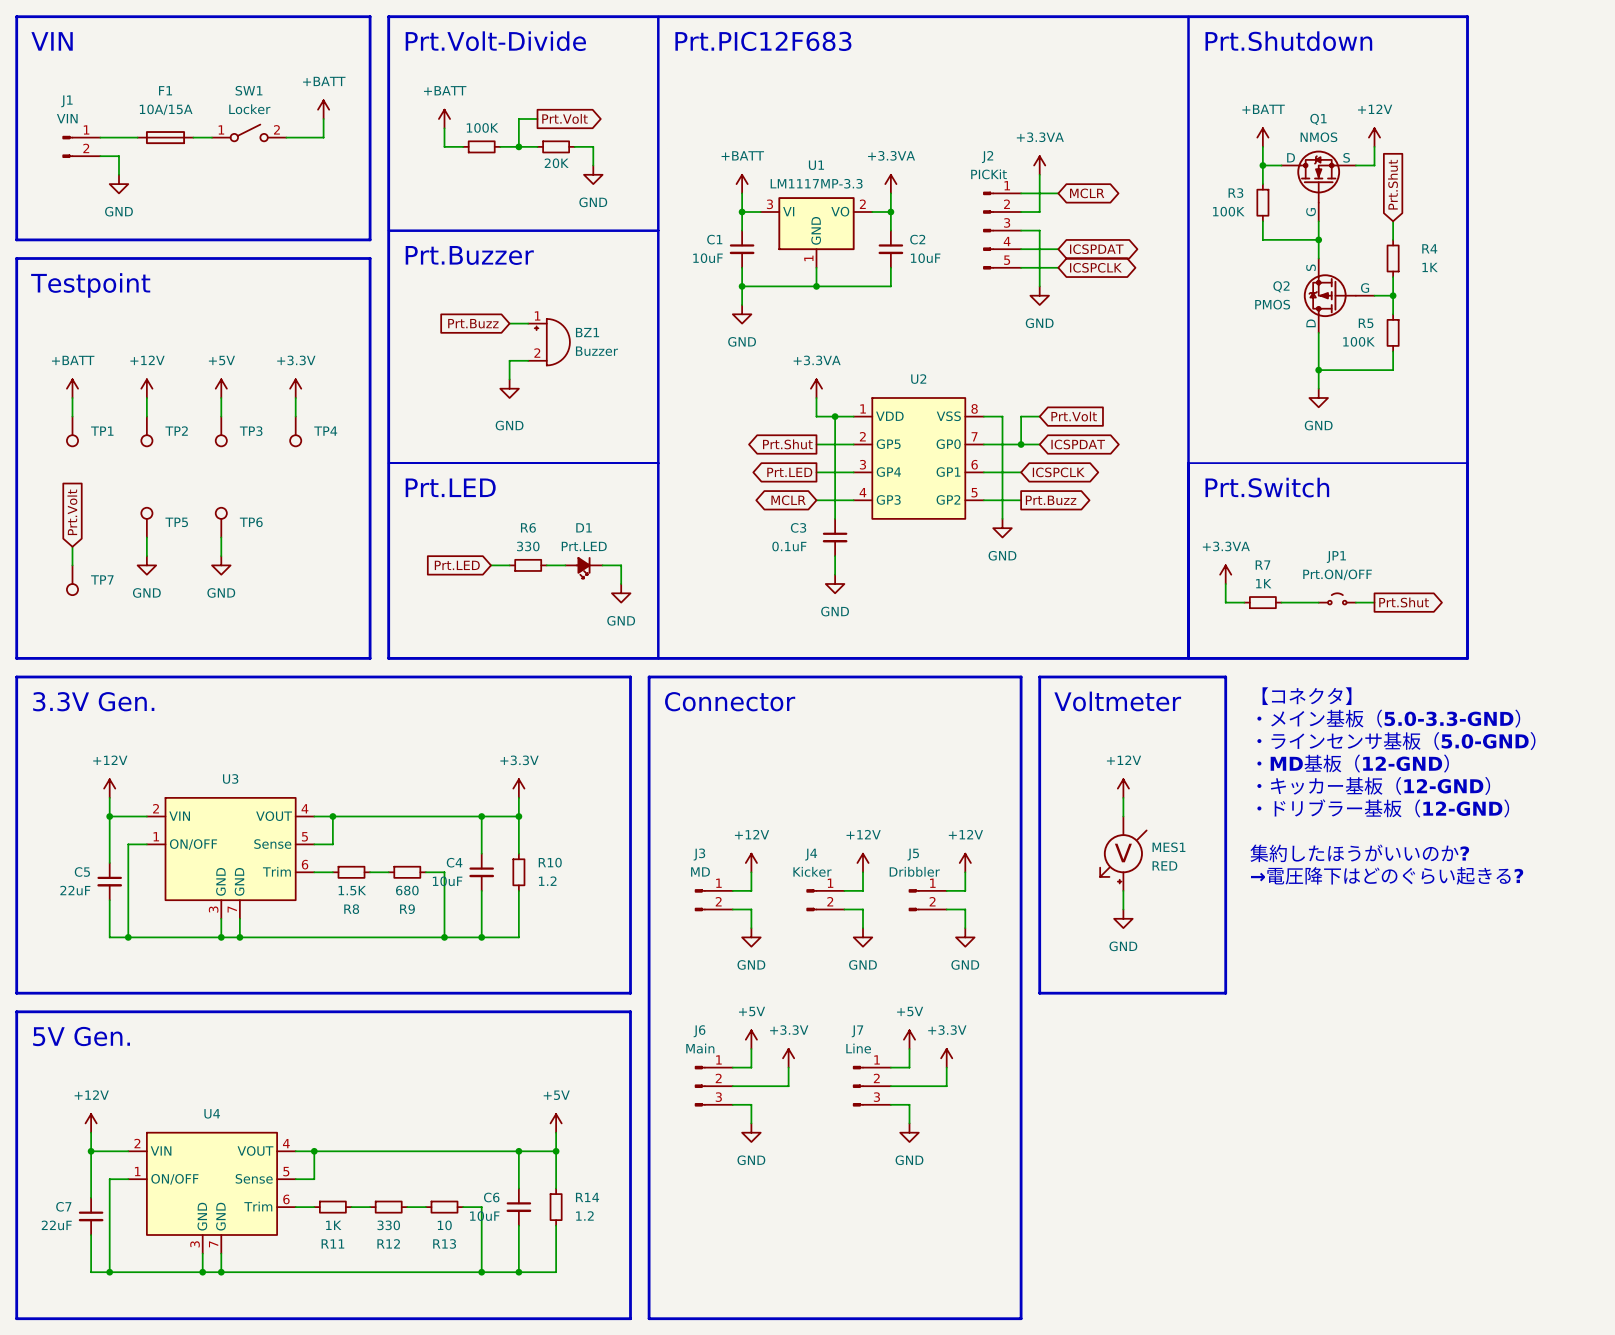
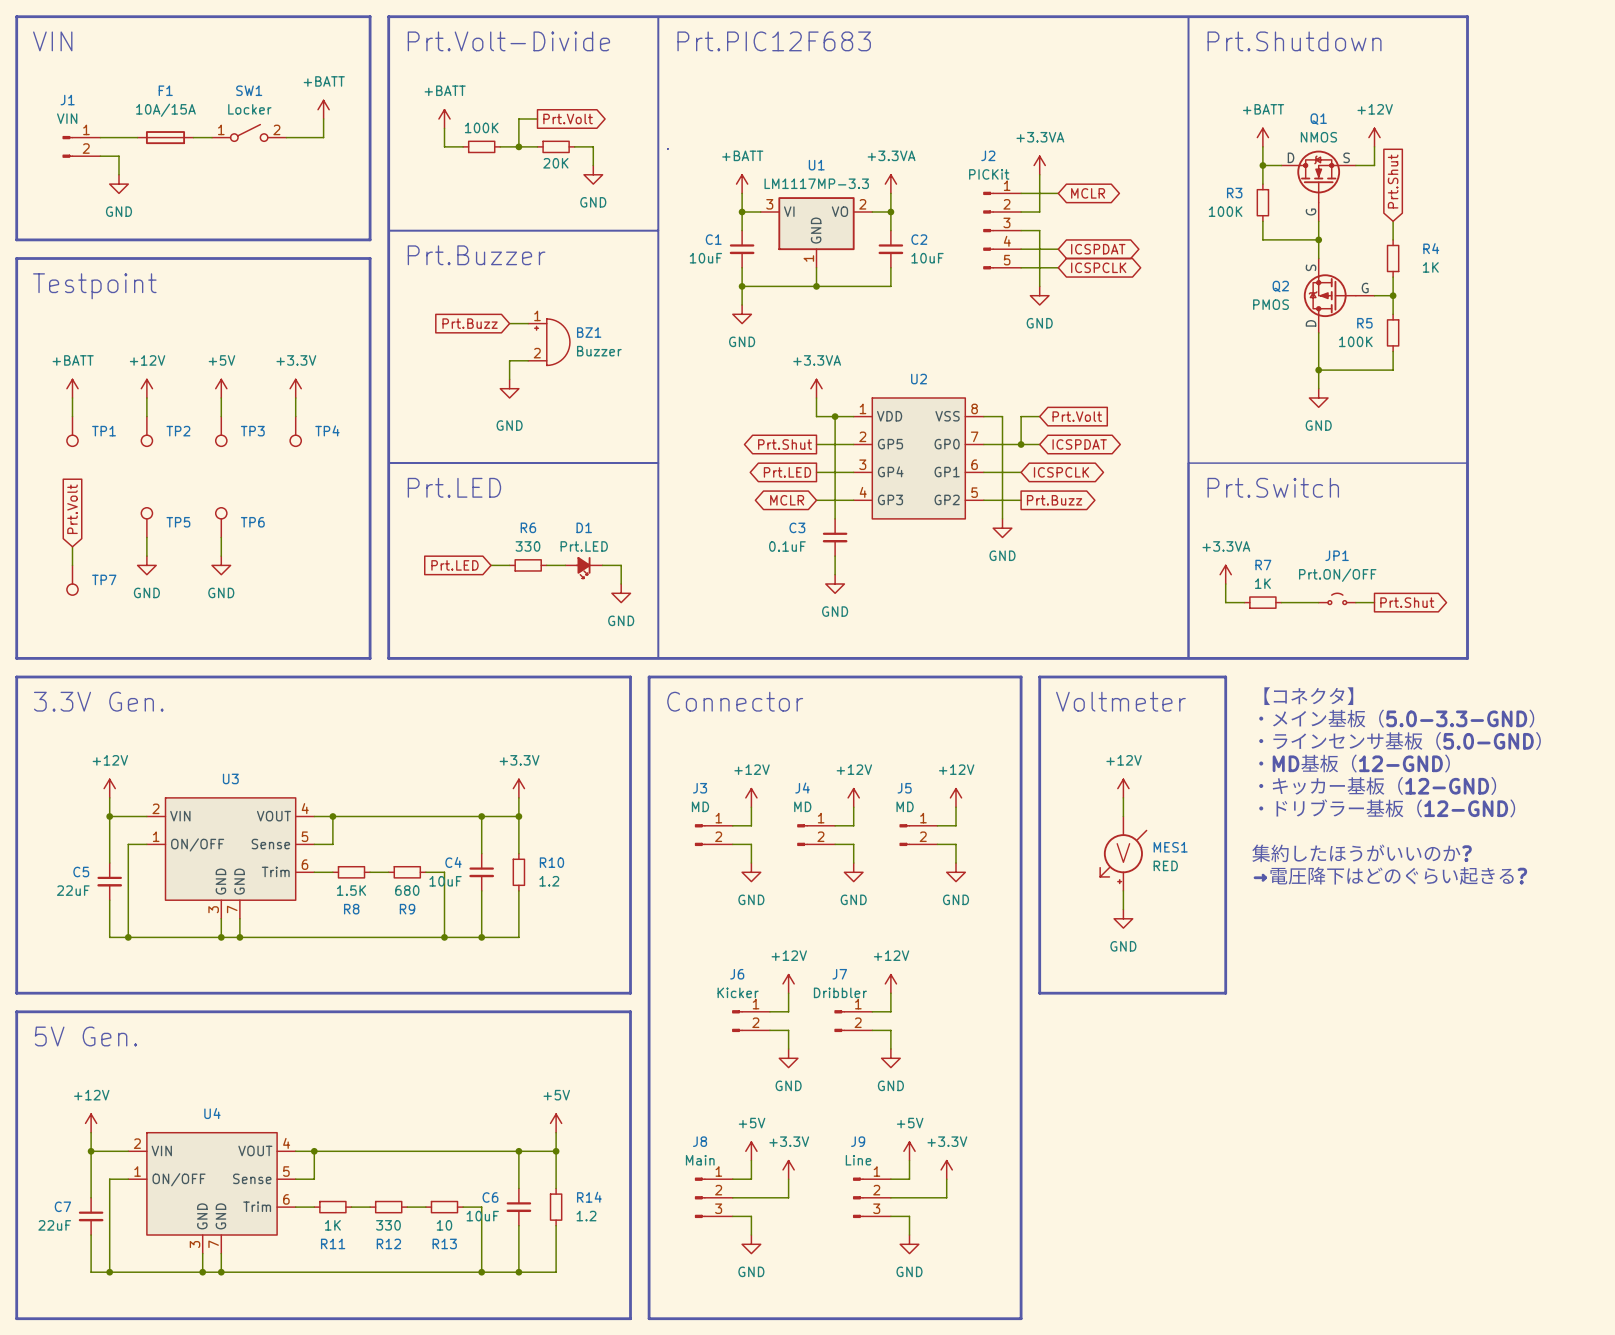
power symbol: none -> +12V (751, 797)
power symbol: none -> +12V (853, 797)
power symbol: none -> +12V (956, 797)
power symbol: +12V (751, 863) -> none
power symbol: +12V (863, 863) -> none
power symbol: +12V (965, 863) -> none
J4 value: Kicker (812, 871) -> MD (802, 806)
J5 value: Dribbler (914, 871) -> MD (905, 806)
wire: (751, 872) (751, 890) (732, 890) -> (751, 807) (751, 825) (732, 825)
power symbol: none -> GND (751, 872)
power symbol: none -> GND (853, 872)
wire: (863, 872) (863, 890) (844, 890) -> (853, 807) (853, 825) (835, 825)
power symbol: none -> GND (956, 872)
wire: (965, 872) (965, 890) (946, 890) -> (956, 807) (956, 825) (937, 825)
J3 position: (713, 900) -> (713, 835)
J4 position: (825, 900) -> (816, 835)
J5 position: (927, 900) -> (918, 835)
wire: (732, 909) (751, 909) (751, 928) -> (732, 844) (751, 844) (751, 863)
wire: (844, 909) (863, 909) (863, 928) -> (835, 844) (853, 844) (853, 863)
wire: (946, 909) (965, 909) (965, 928) -> (937, 844) (956, 844) (956, 863)
power symbol: GND (751, 937) -> none
power symbol: GND (863, 937) -> none
power symbol: GND (965, 937) -> none
power symbol: none -> +12V (788, 983)
power symbol: none -> +12V (890, 983)
wire: none -> (788, 993) (788, 1011) (770, 1011)
wire: none -> (890, 993) (890, 1011) (872, 1011)
wire: none -> (770, 1030) (788, 1030) (788, 1049)
wire: none -> (872, 1030) (890, 1030) (890, 1049)
power symbol: +5V (751, 1039) -> none
power symbol: +5V (909, 1039) -> none
J6 value: Main (700, 1048) -> Kicker (738, 992)
J7 value: Line (858, 1048) -> Dribbler (840, 992)
wire: (751, 1049) (751, 1067) (732, 1067) -> (751, 1160) (751, 1179) (732, 1179)
wire: (909, 1049) (909, 1067) (890, 1067) -> (909, 1160) (909, 1179) (890, 1179)
power symbol: +3.3V (788, 1058) -> GND (788, 1058)
power symbol: none -> GND (890, 1058)
power symbol: +3.3V (946, 1058) -> none
J6 symbol: [695, 1066, 733, 1107] -> [732, 1010, 771, 1032]
J7 symbol: [853, 1066, 891, 1107] -> [834, 1010, 873, 1032]
wire: (788, 1067) (788, 1086) (732, 1086) -> (788, 1179) (788, 1197) (732, 1197)
wire: (946, 1067) (946, 1086) (890, 1086) -> (946, 1179) (946, 1197) (890, 1197)
wire: (732, 1104) (751, 1104) (751, 1123) -> (732, 1216) (751, 1216) (751, 1235)
wire: (890, 1104) (909, 1104) (909, 1123) -> (890, 1216) (909, 1216) (909, 1235)
power symbol: GND (751, 1132) -> none
power symbol: GND (909, 1132) -> none
power symbol: none -> +5V (751, 1151)
power symbol: none -> +5V (909, 1151)
power symbol: none -> +3.3V (788, 1169)
power symbol: none -> +3.3V (946, 1169)
J8: none -> Main (713, 1197)
J9: none -> Line (872, 1197)
power symbol: none -> GND (751, 1244)
power symbol: none -> GND (909, 1244)

